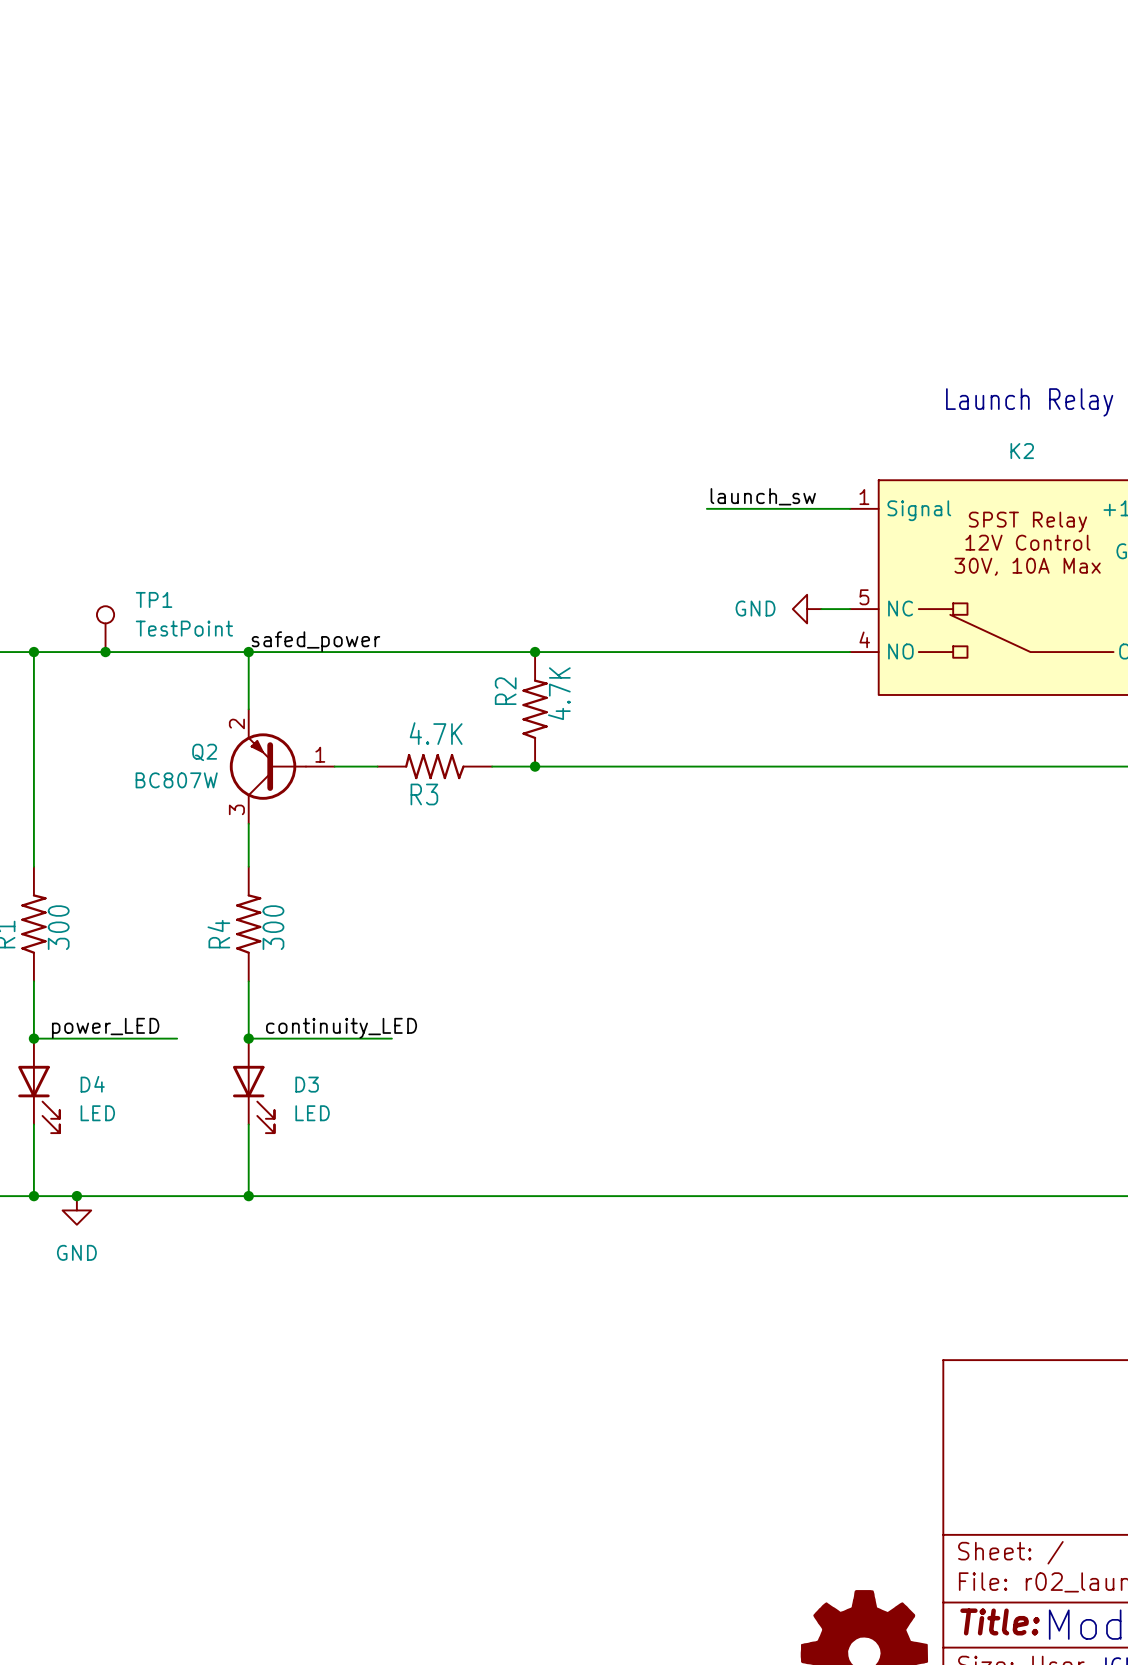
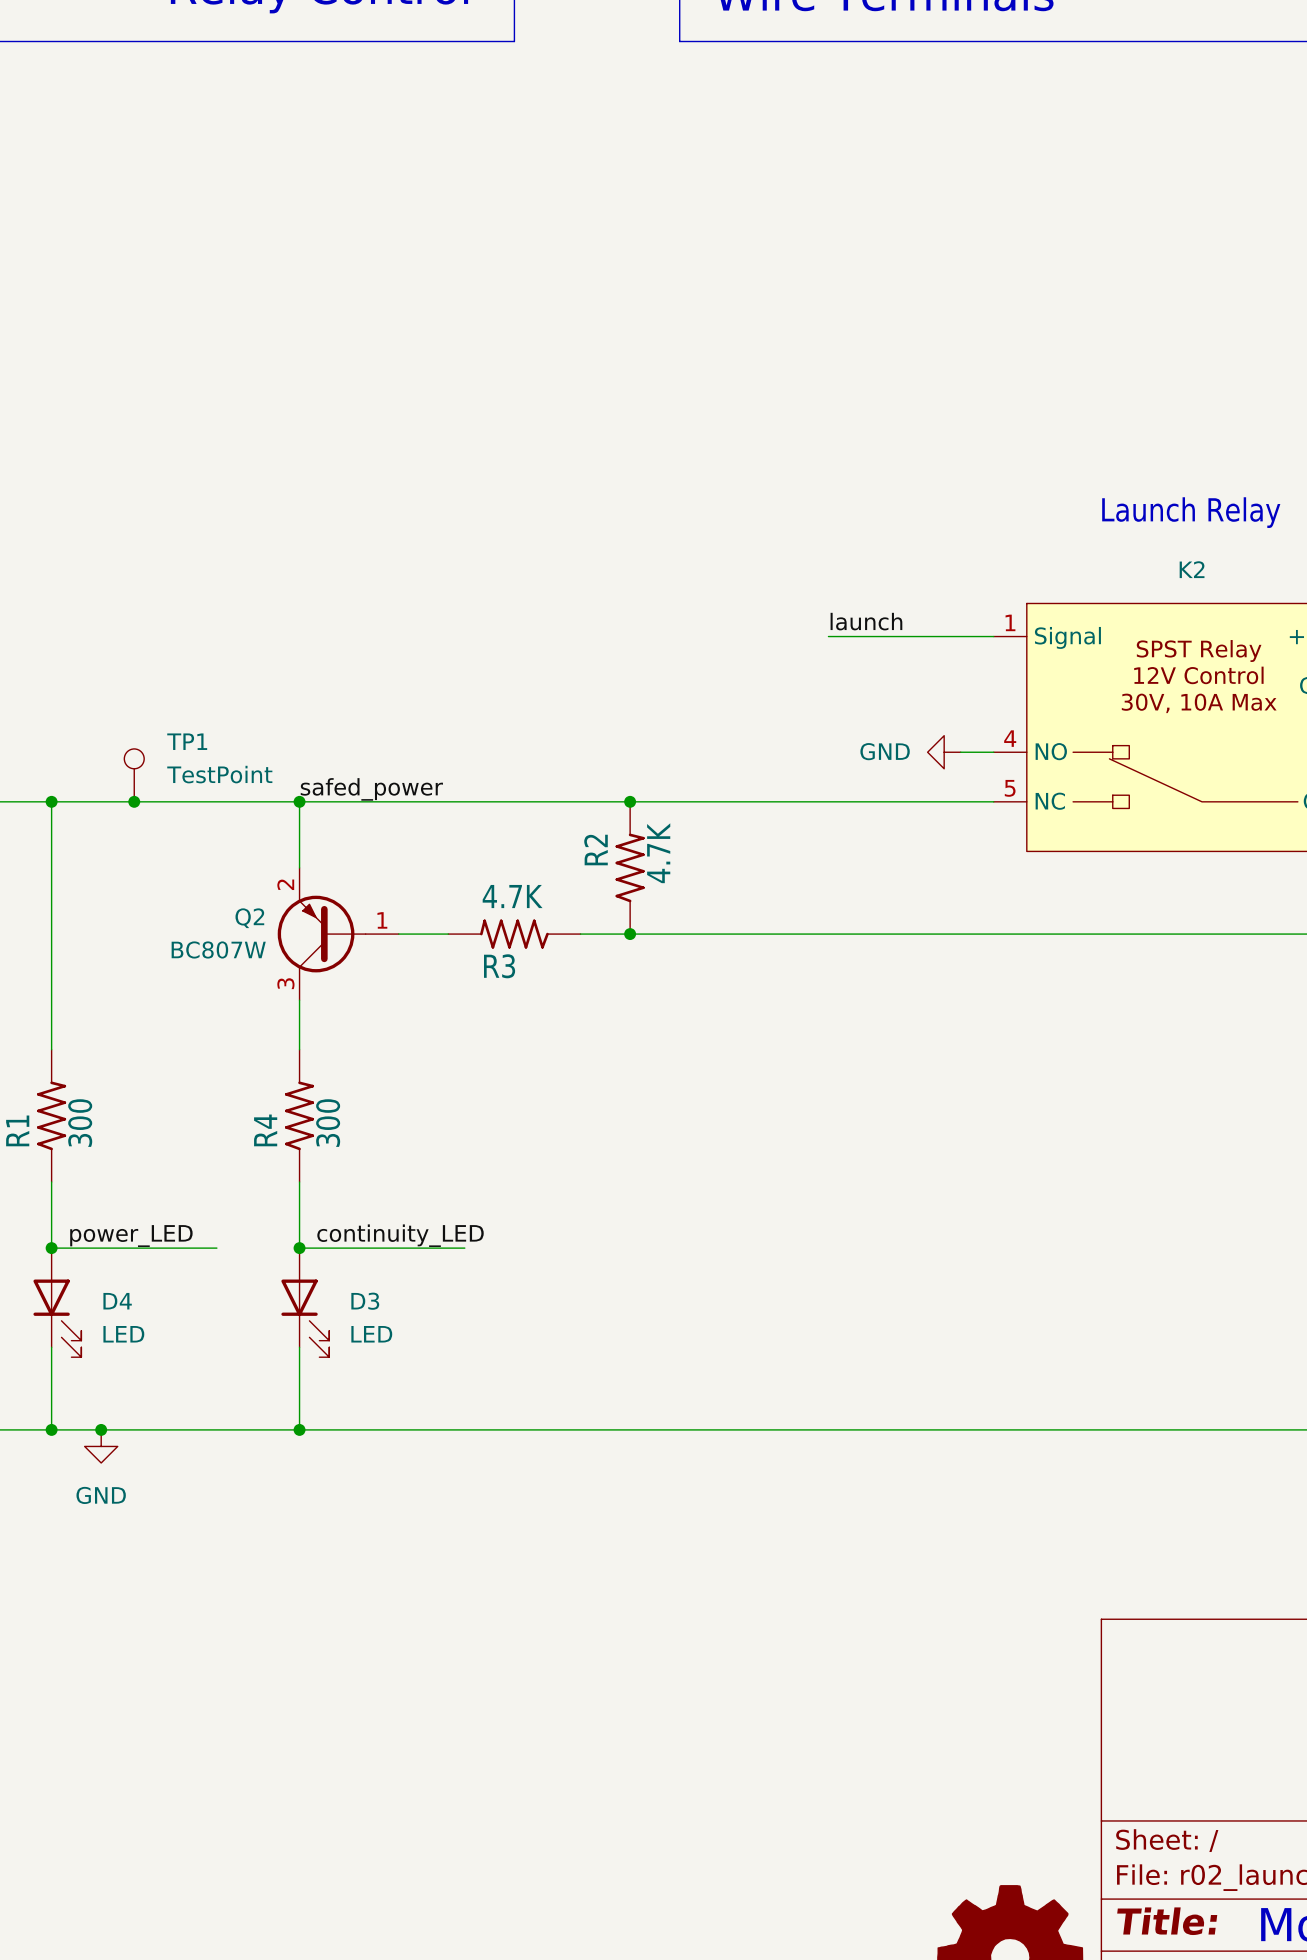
label: launch_sw (763, 496) -> launch (866, 621)
K2 pin number: 5 (864, 597) -> 4 (1010, 738)
K2 pin name: NC (900, 608) -> NO (1051, 751)
K2 pin number: 4 (864, 639) -> 5 (1010, 788)
K2 pin name: NO (900, 651) -> NC (1050, 801)

